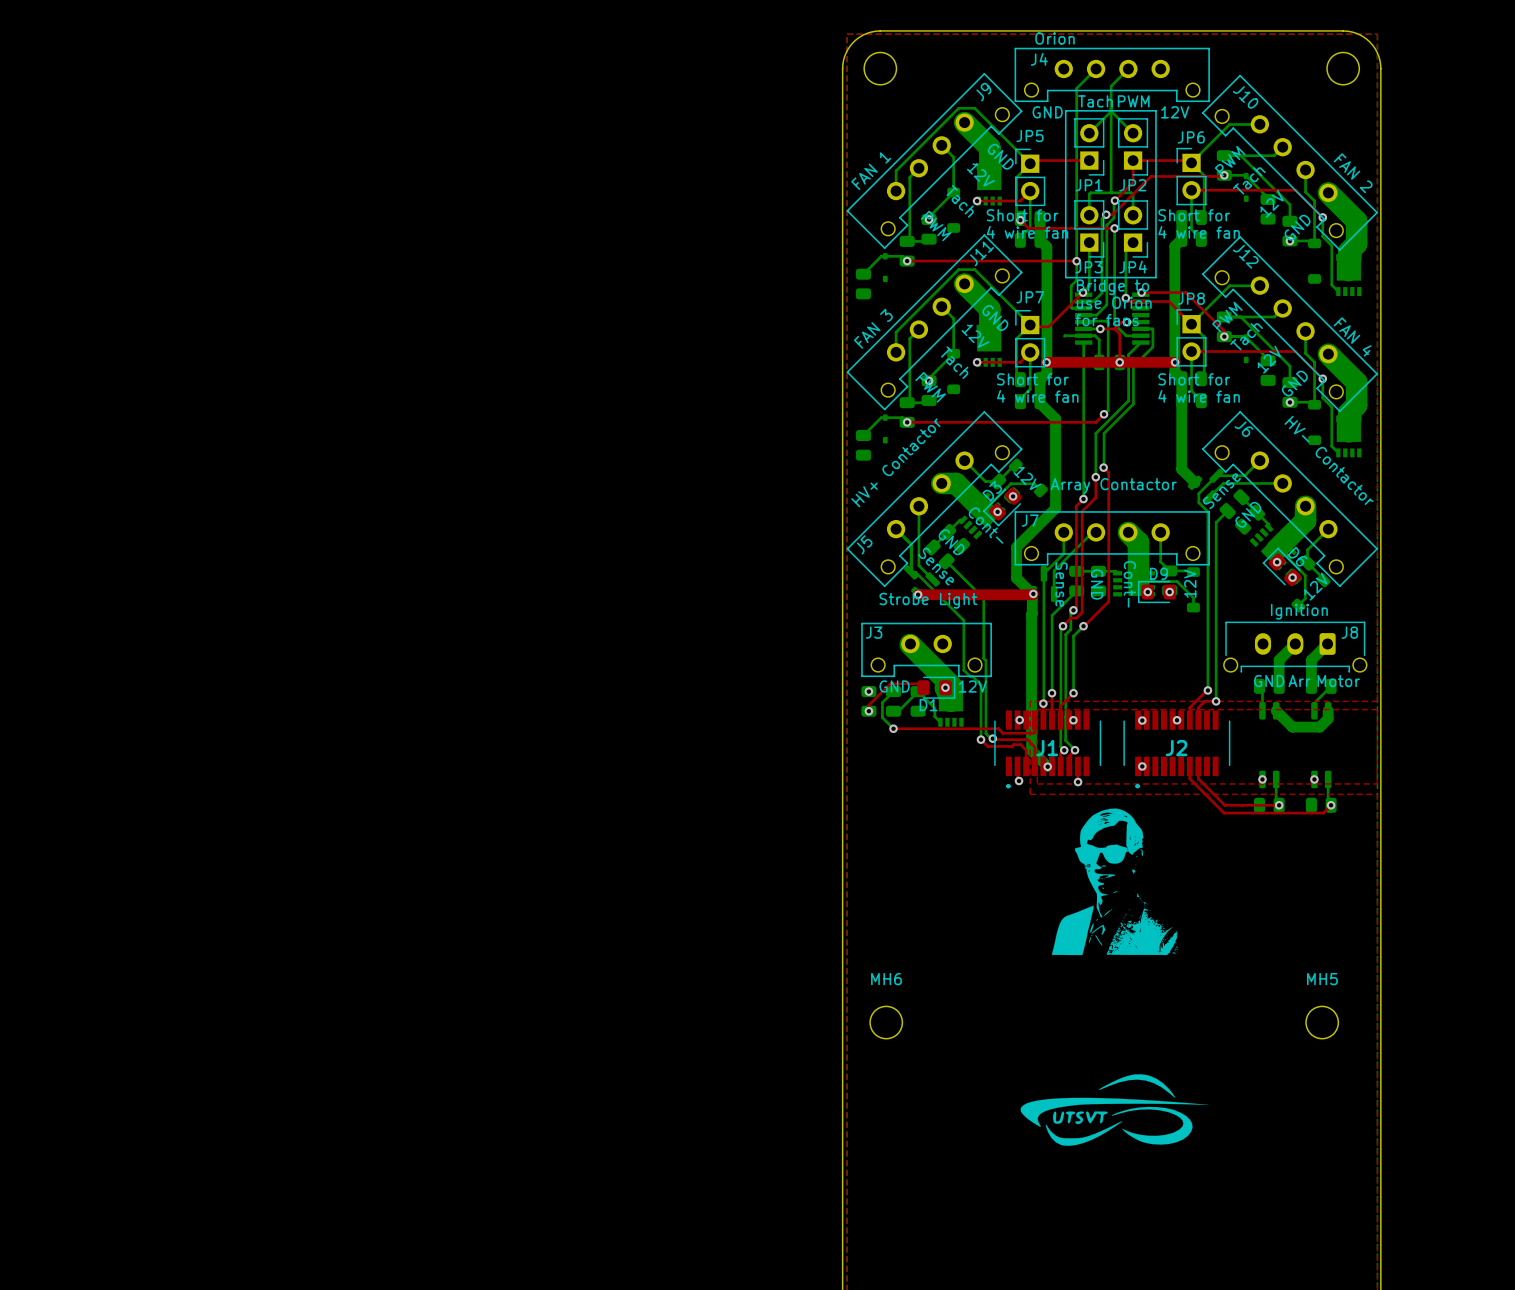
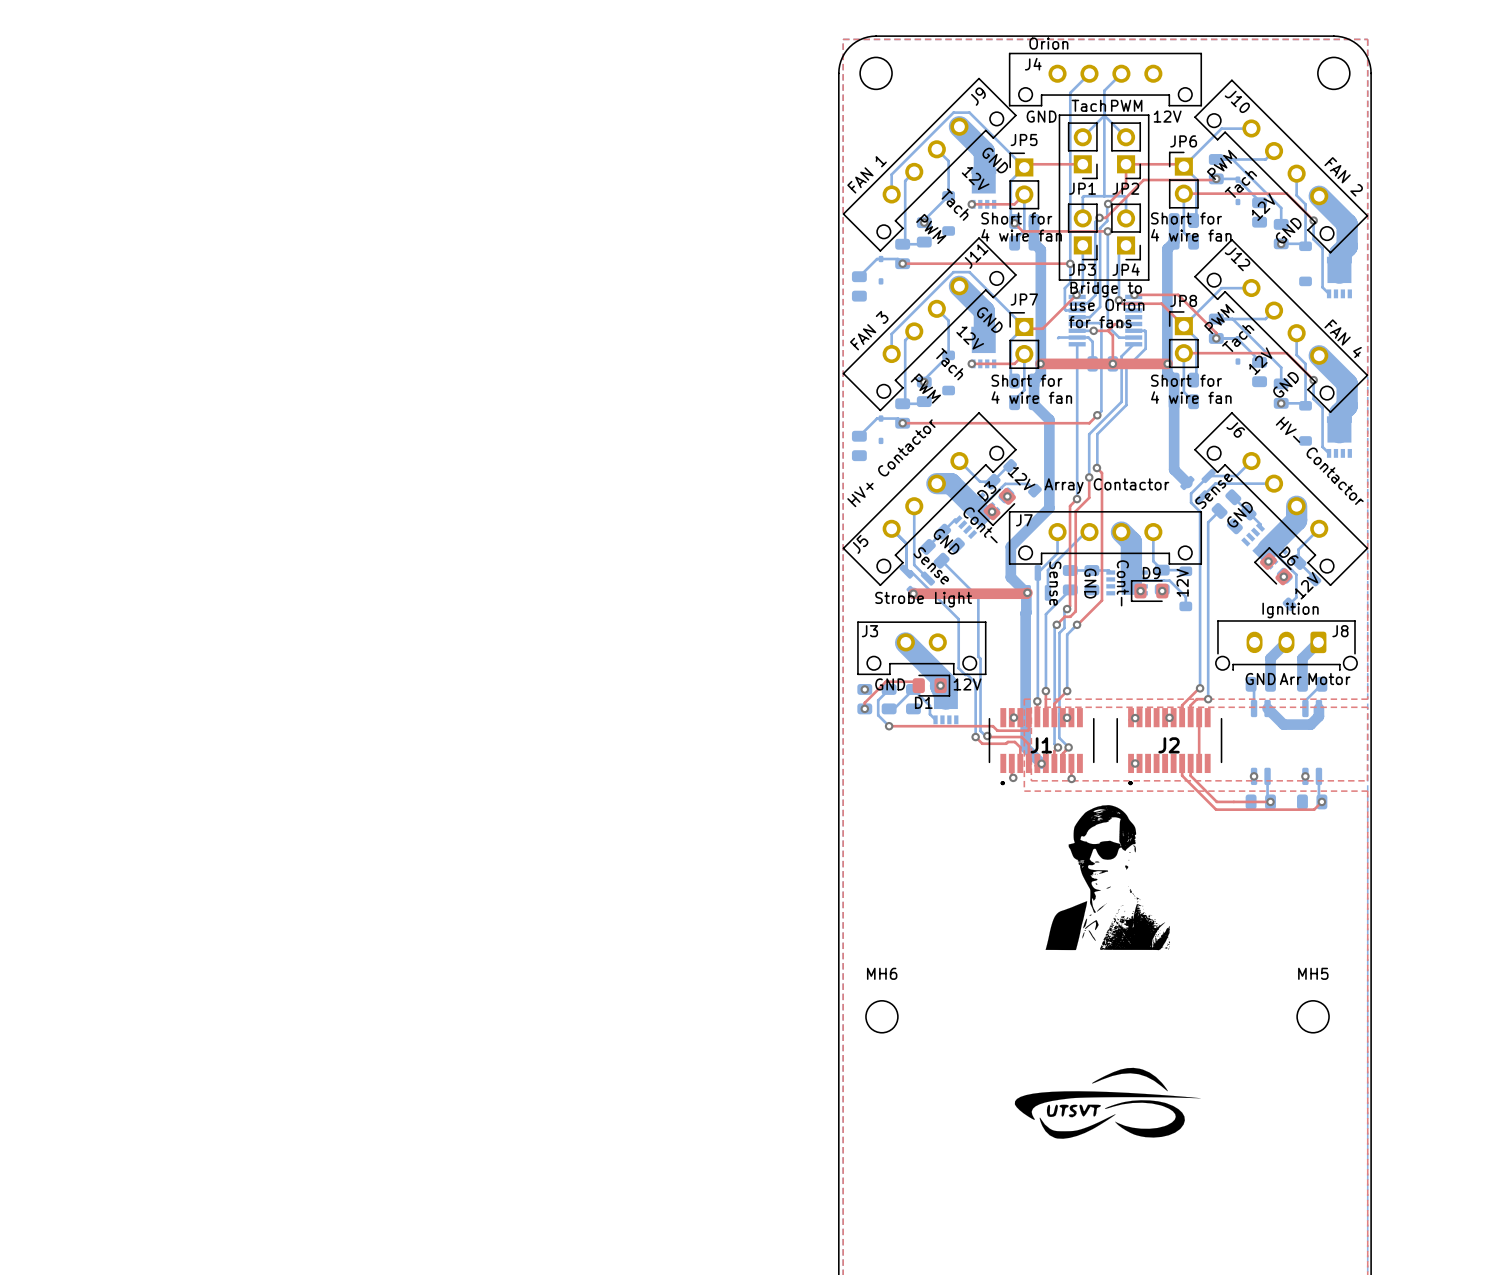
top track: none -> (1199, 717) (1199, 763)

